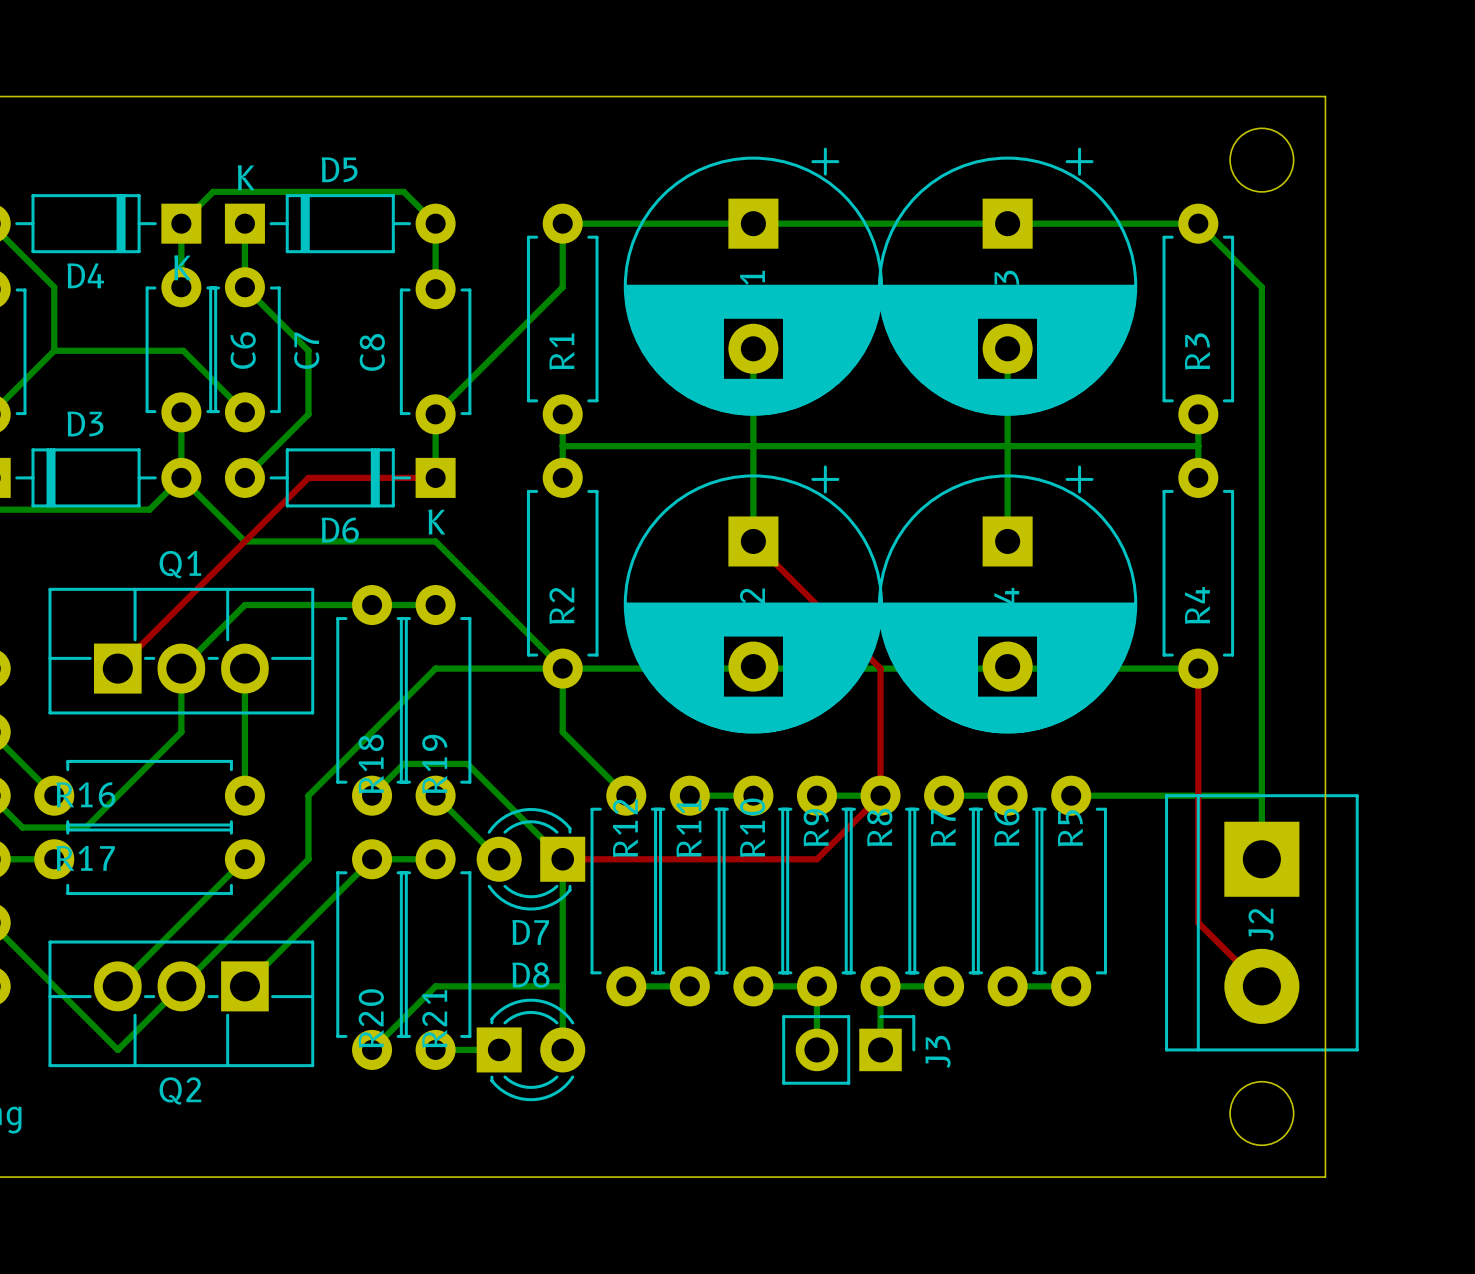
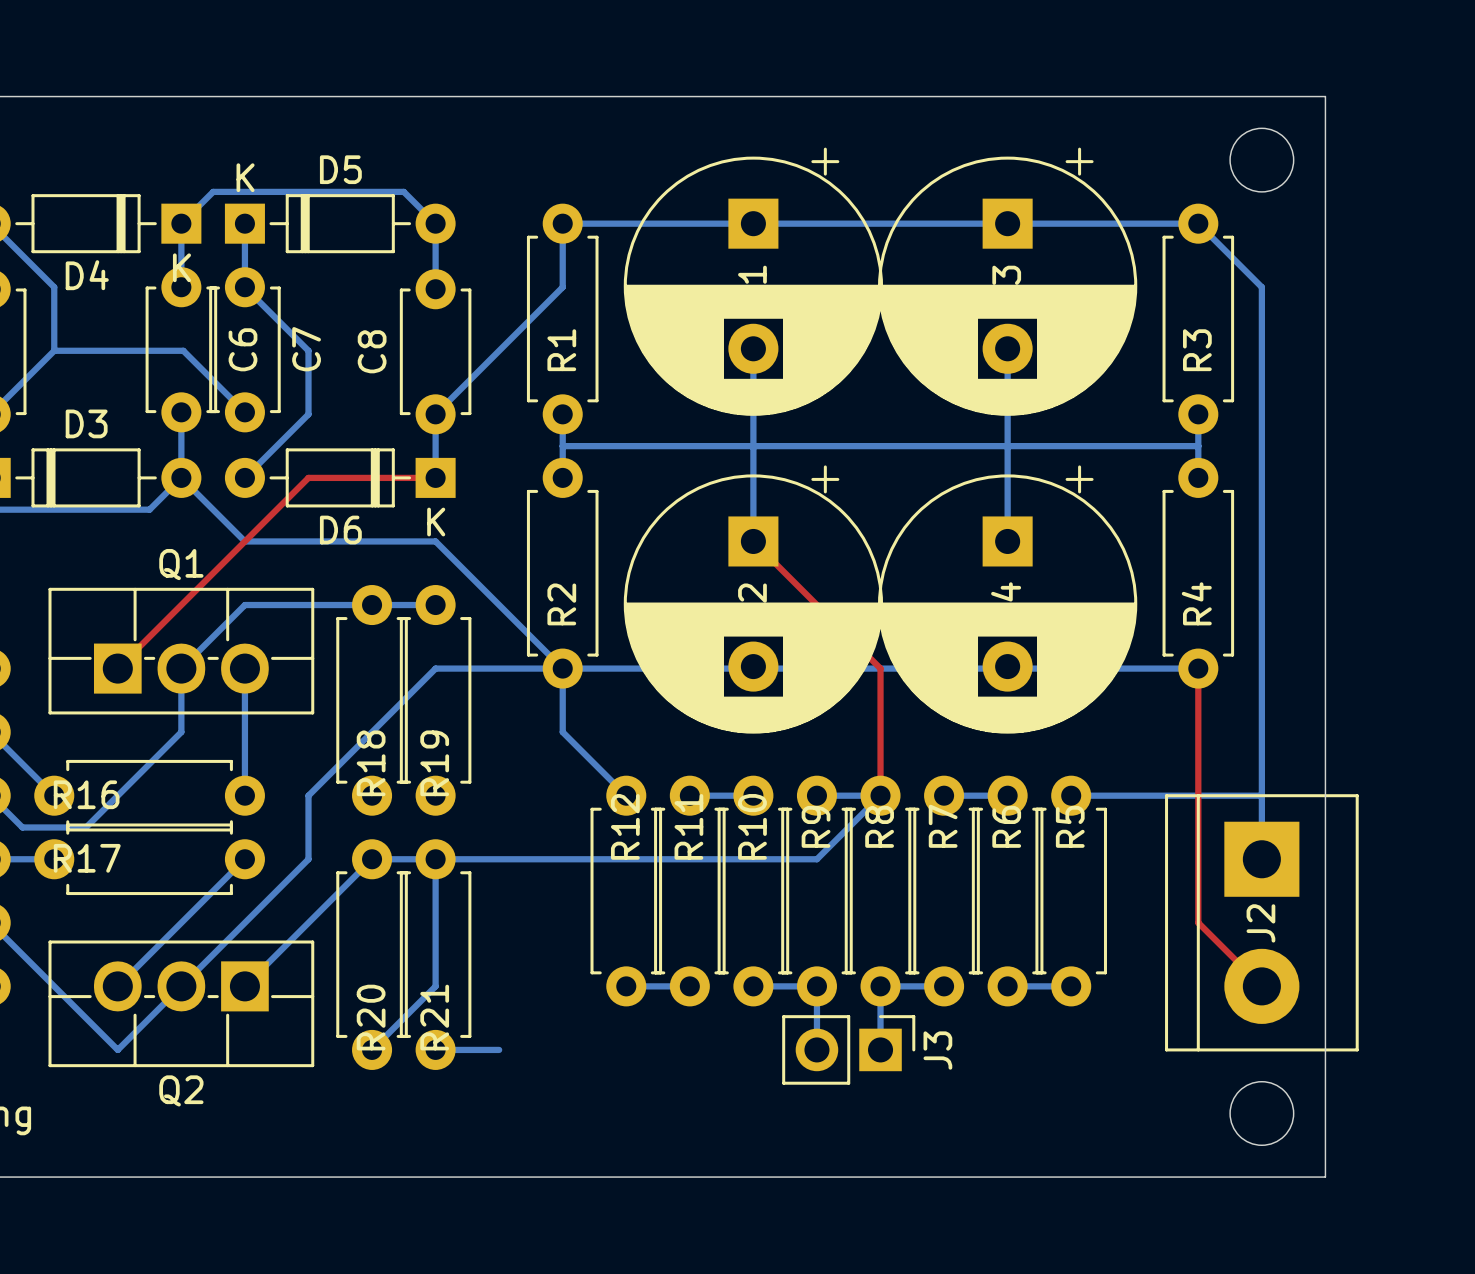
bottom track: (372, 795) (403, 763) (467, 763) (562, 859) (562, 1049) -> none
bottom track: (435, 795) (499, 859) -> none
top track: (880, 795) (816, 859) (562, 859) -> none
D7: (530, 859) -> none
bottom track: (435, 986) (562, 986) -> (435, 986) (435, 859) (816, 859) (880, 795)
D8: (530, 1049) -> none

